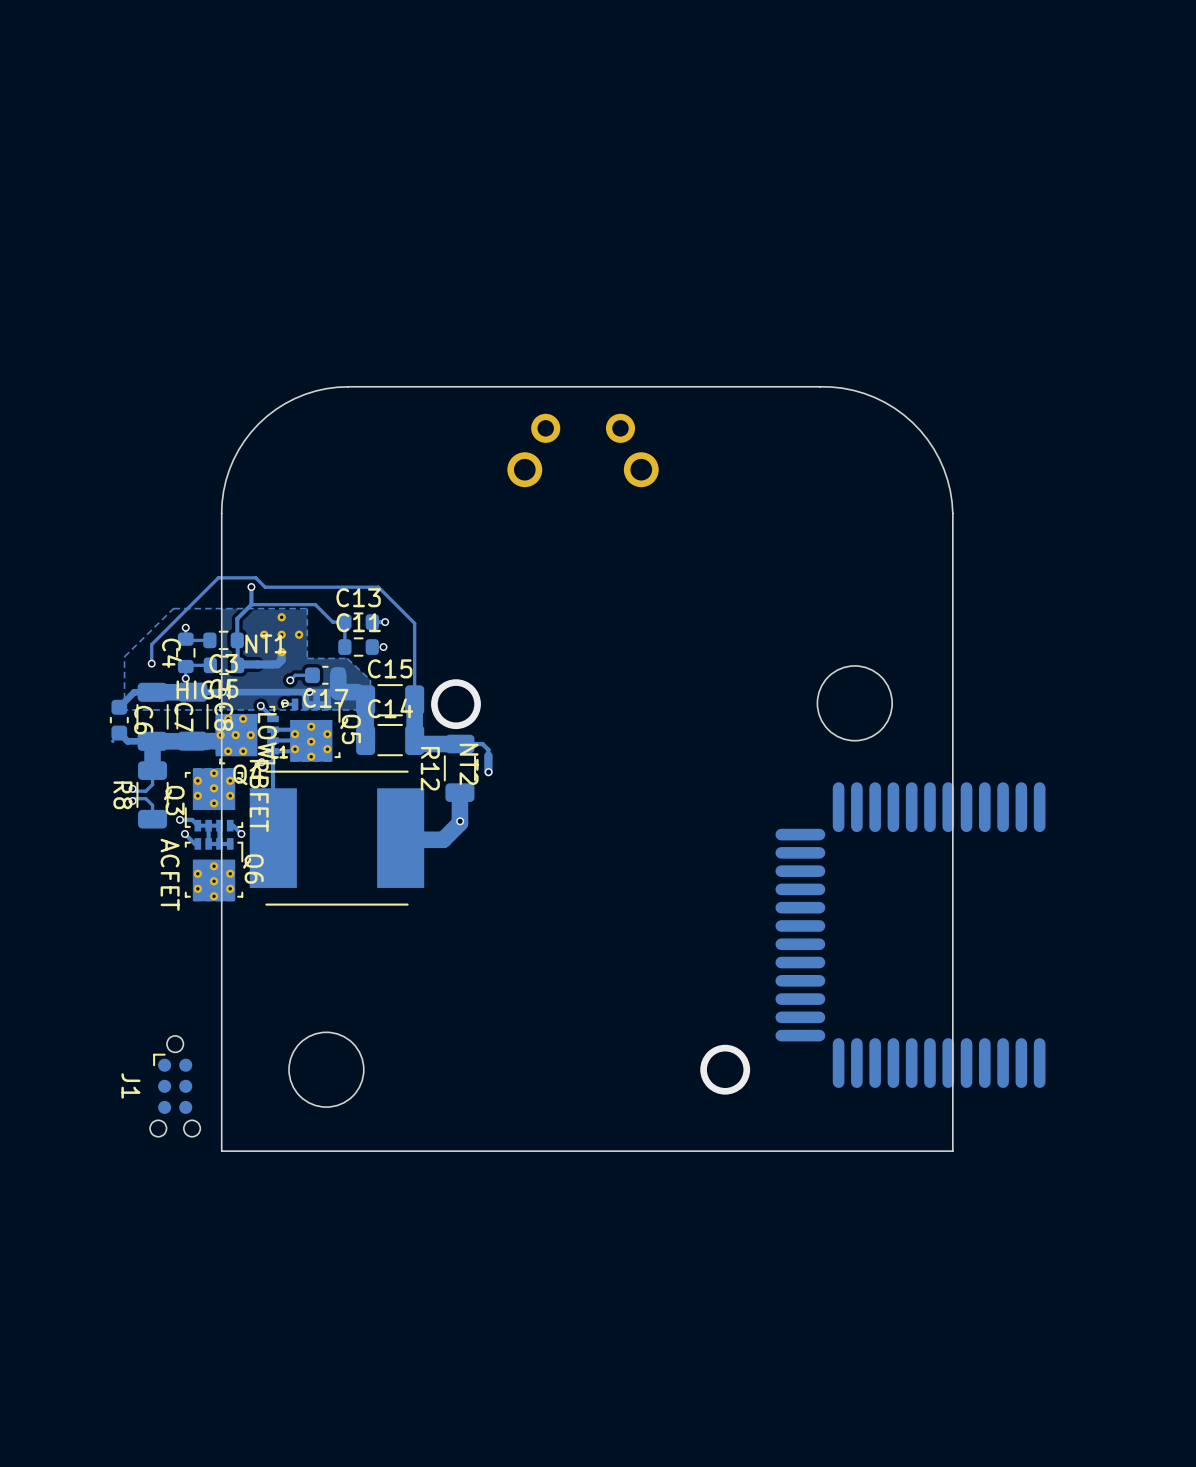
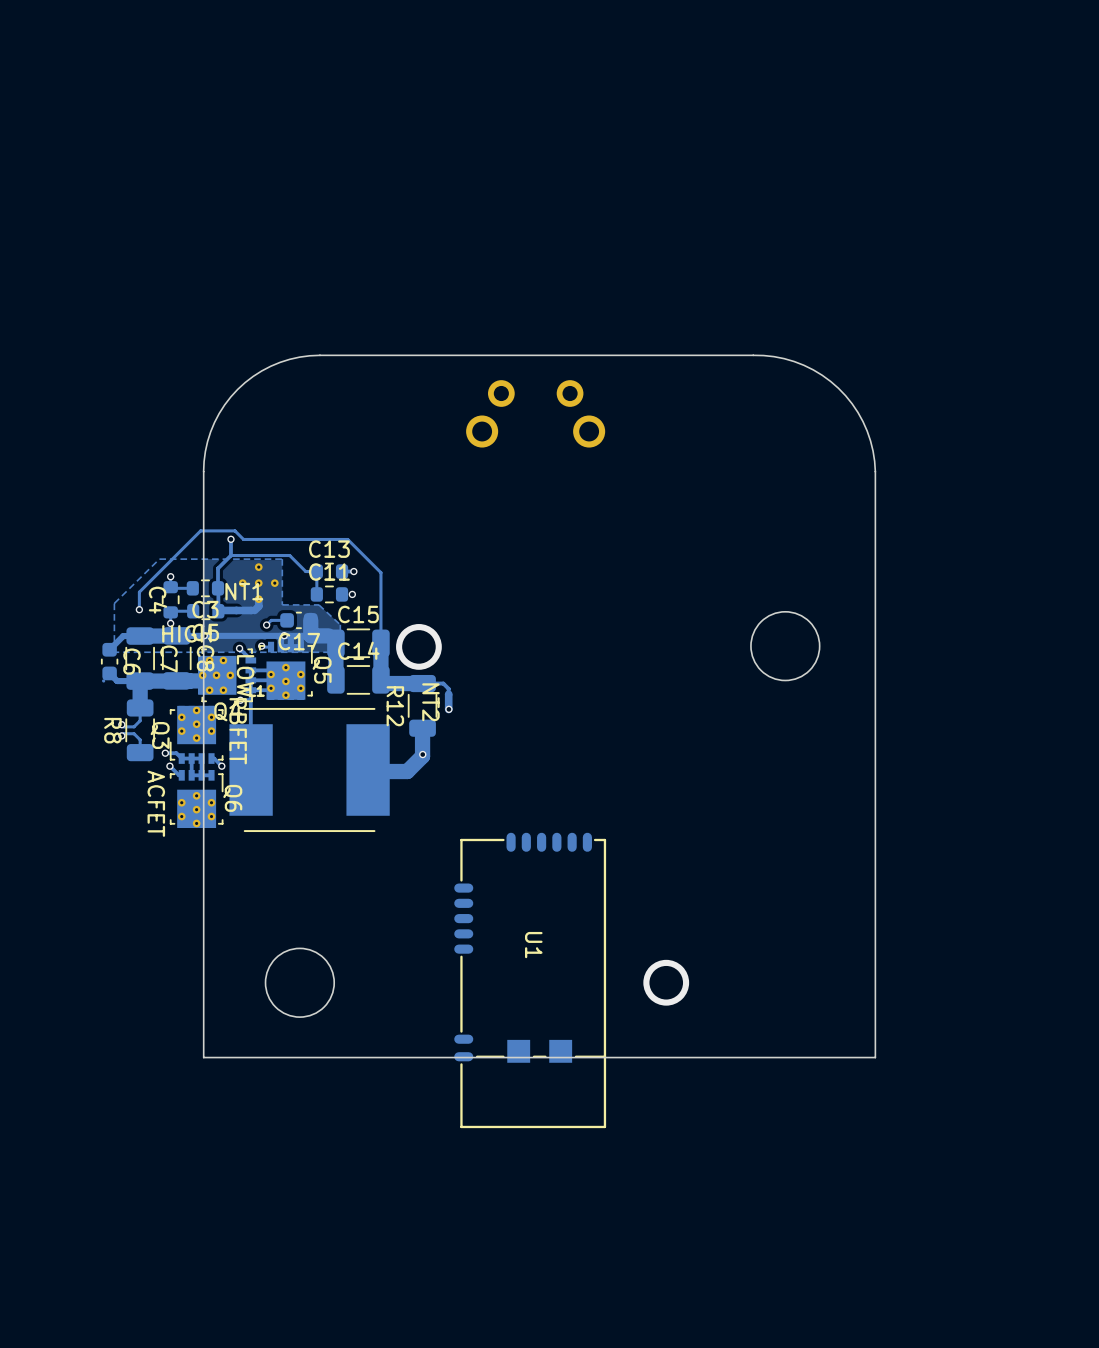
part: (910, 935) -> none
U1: none -> (530, 980)
J1: (175, 1086) -> none

